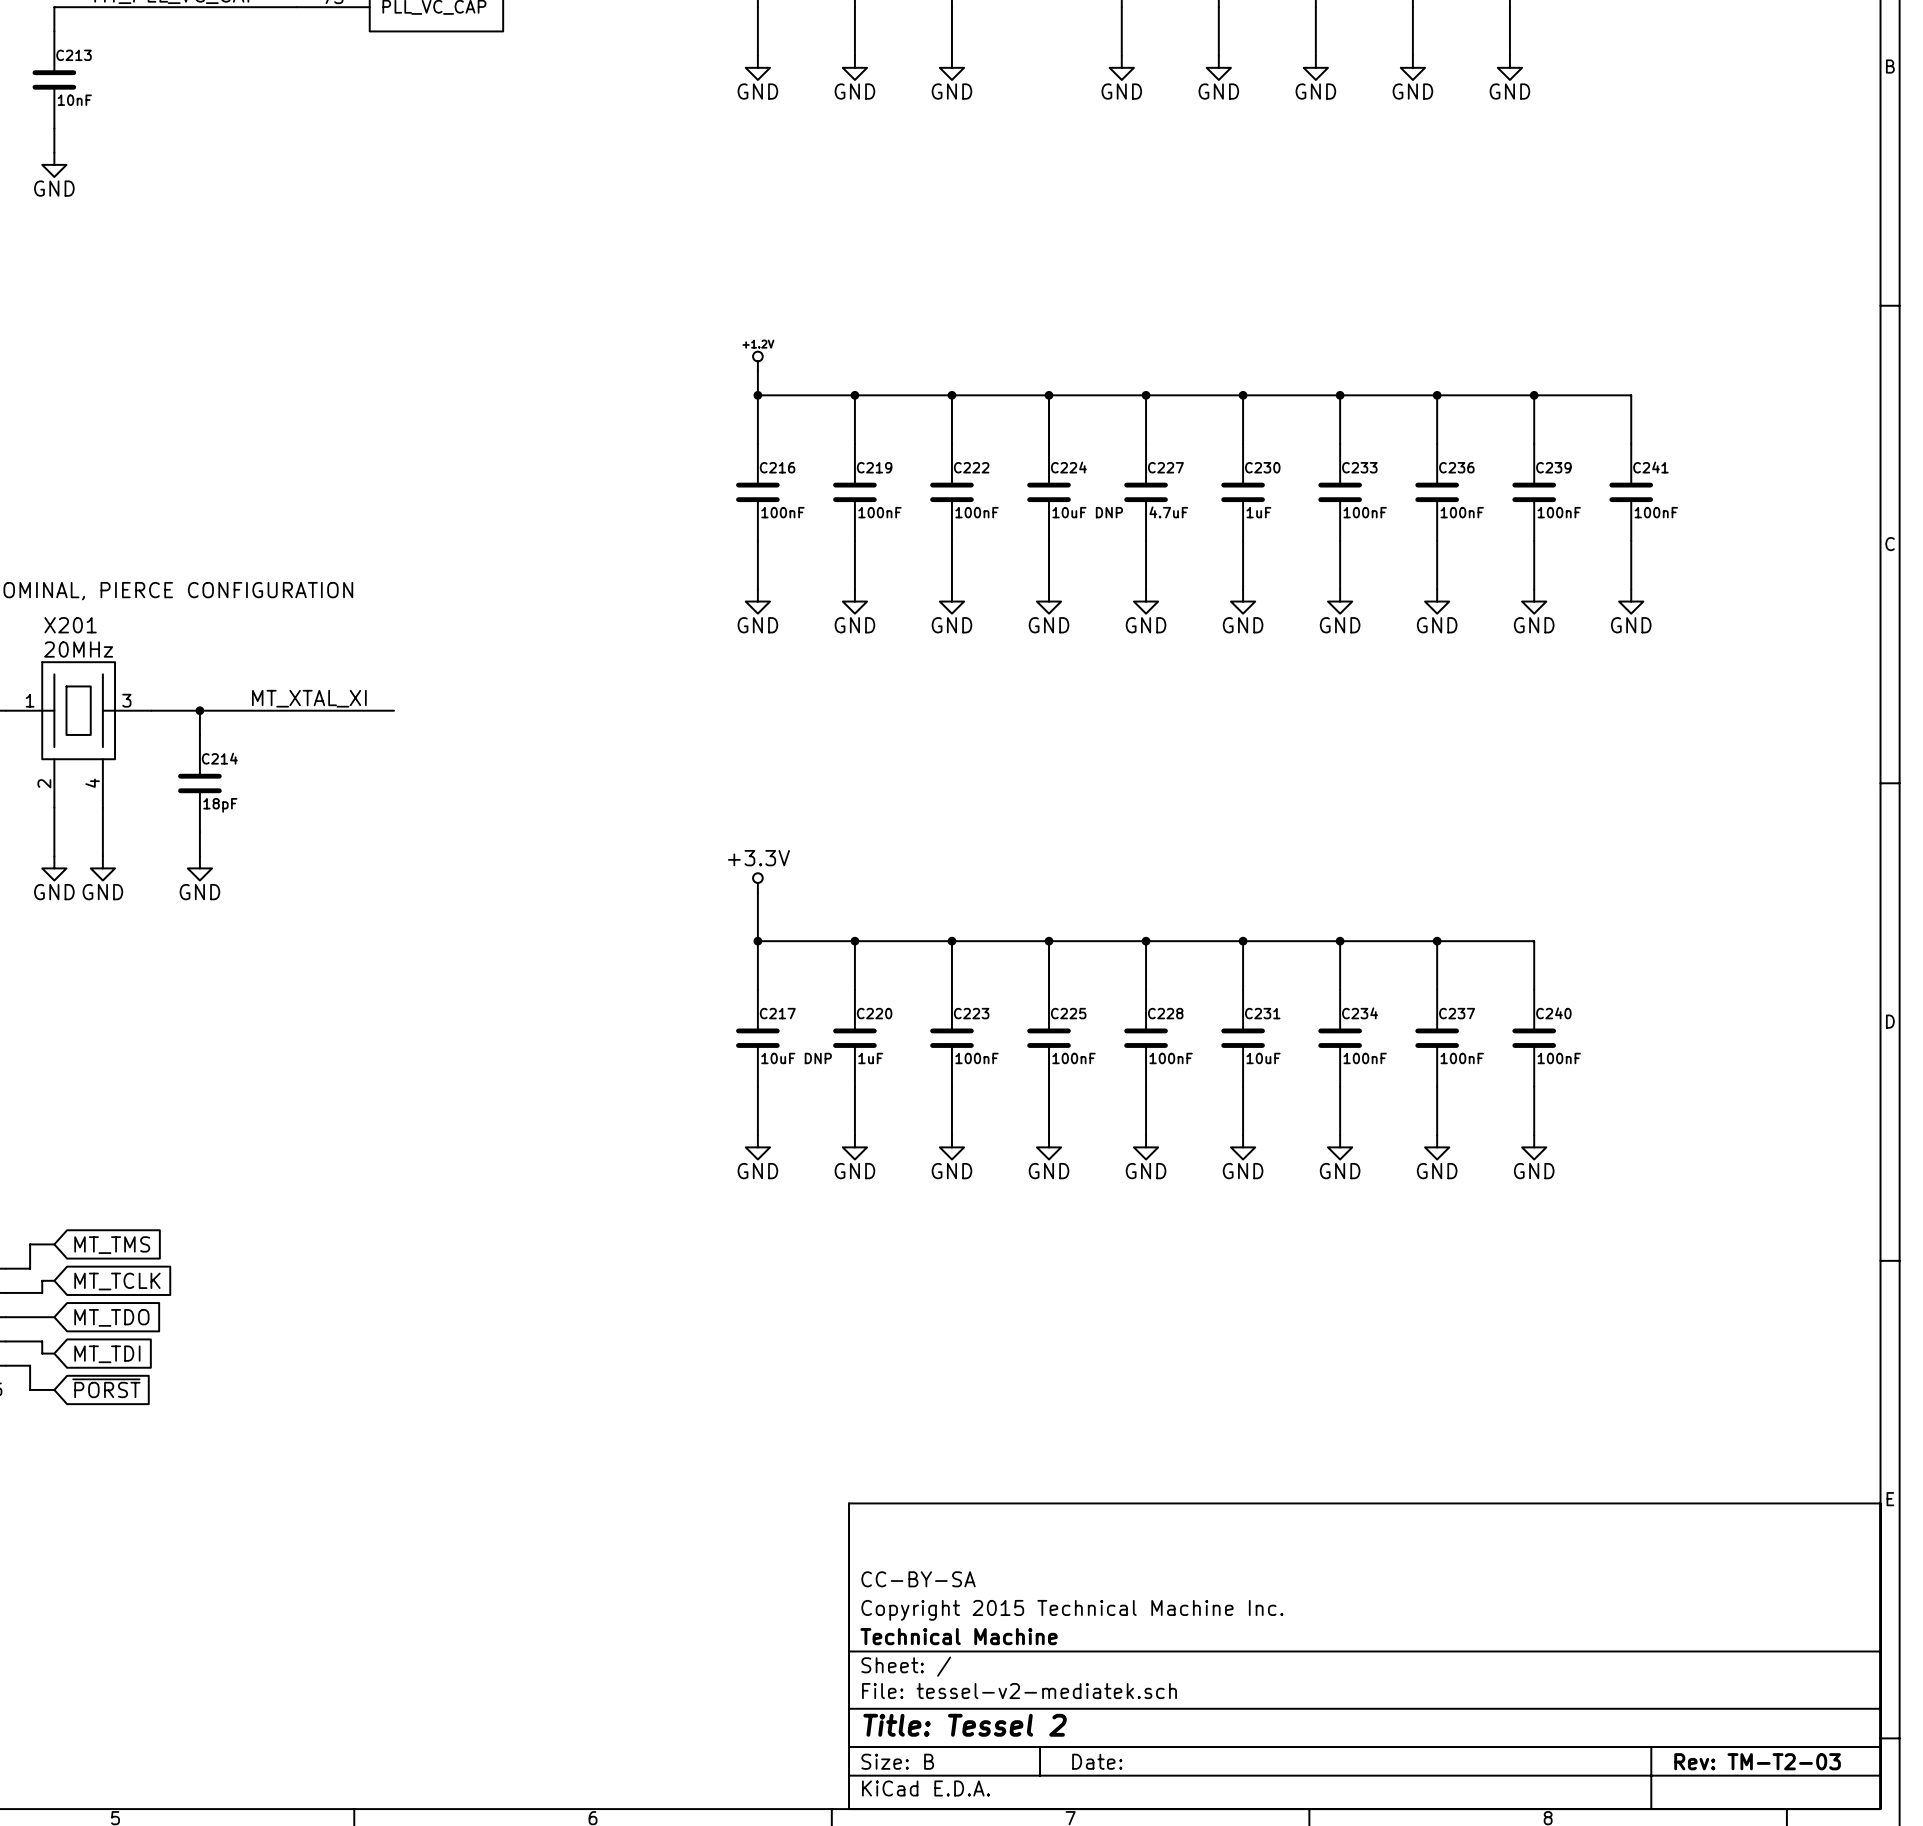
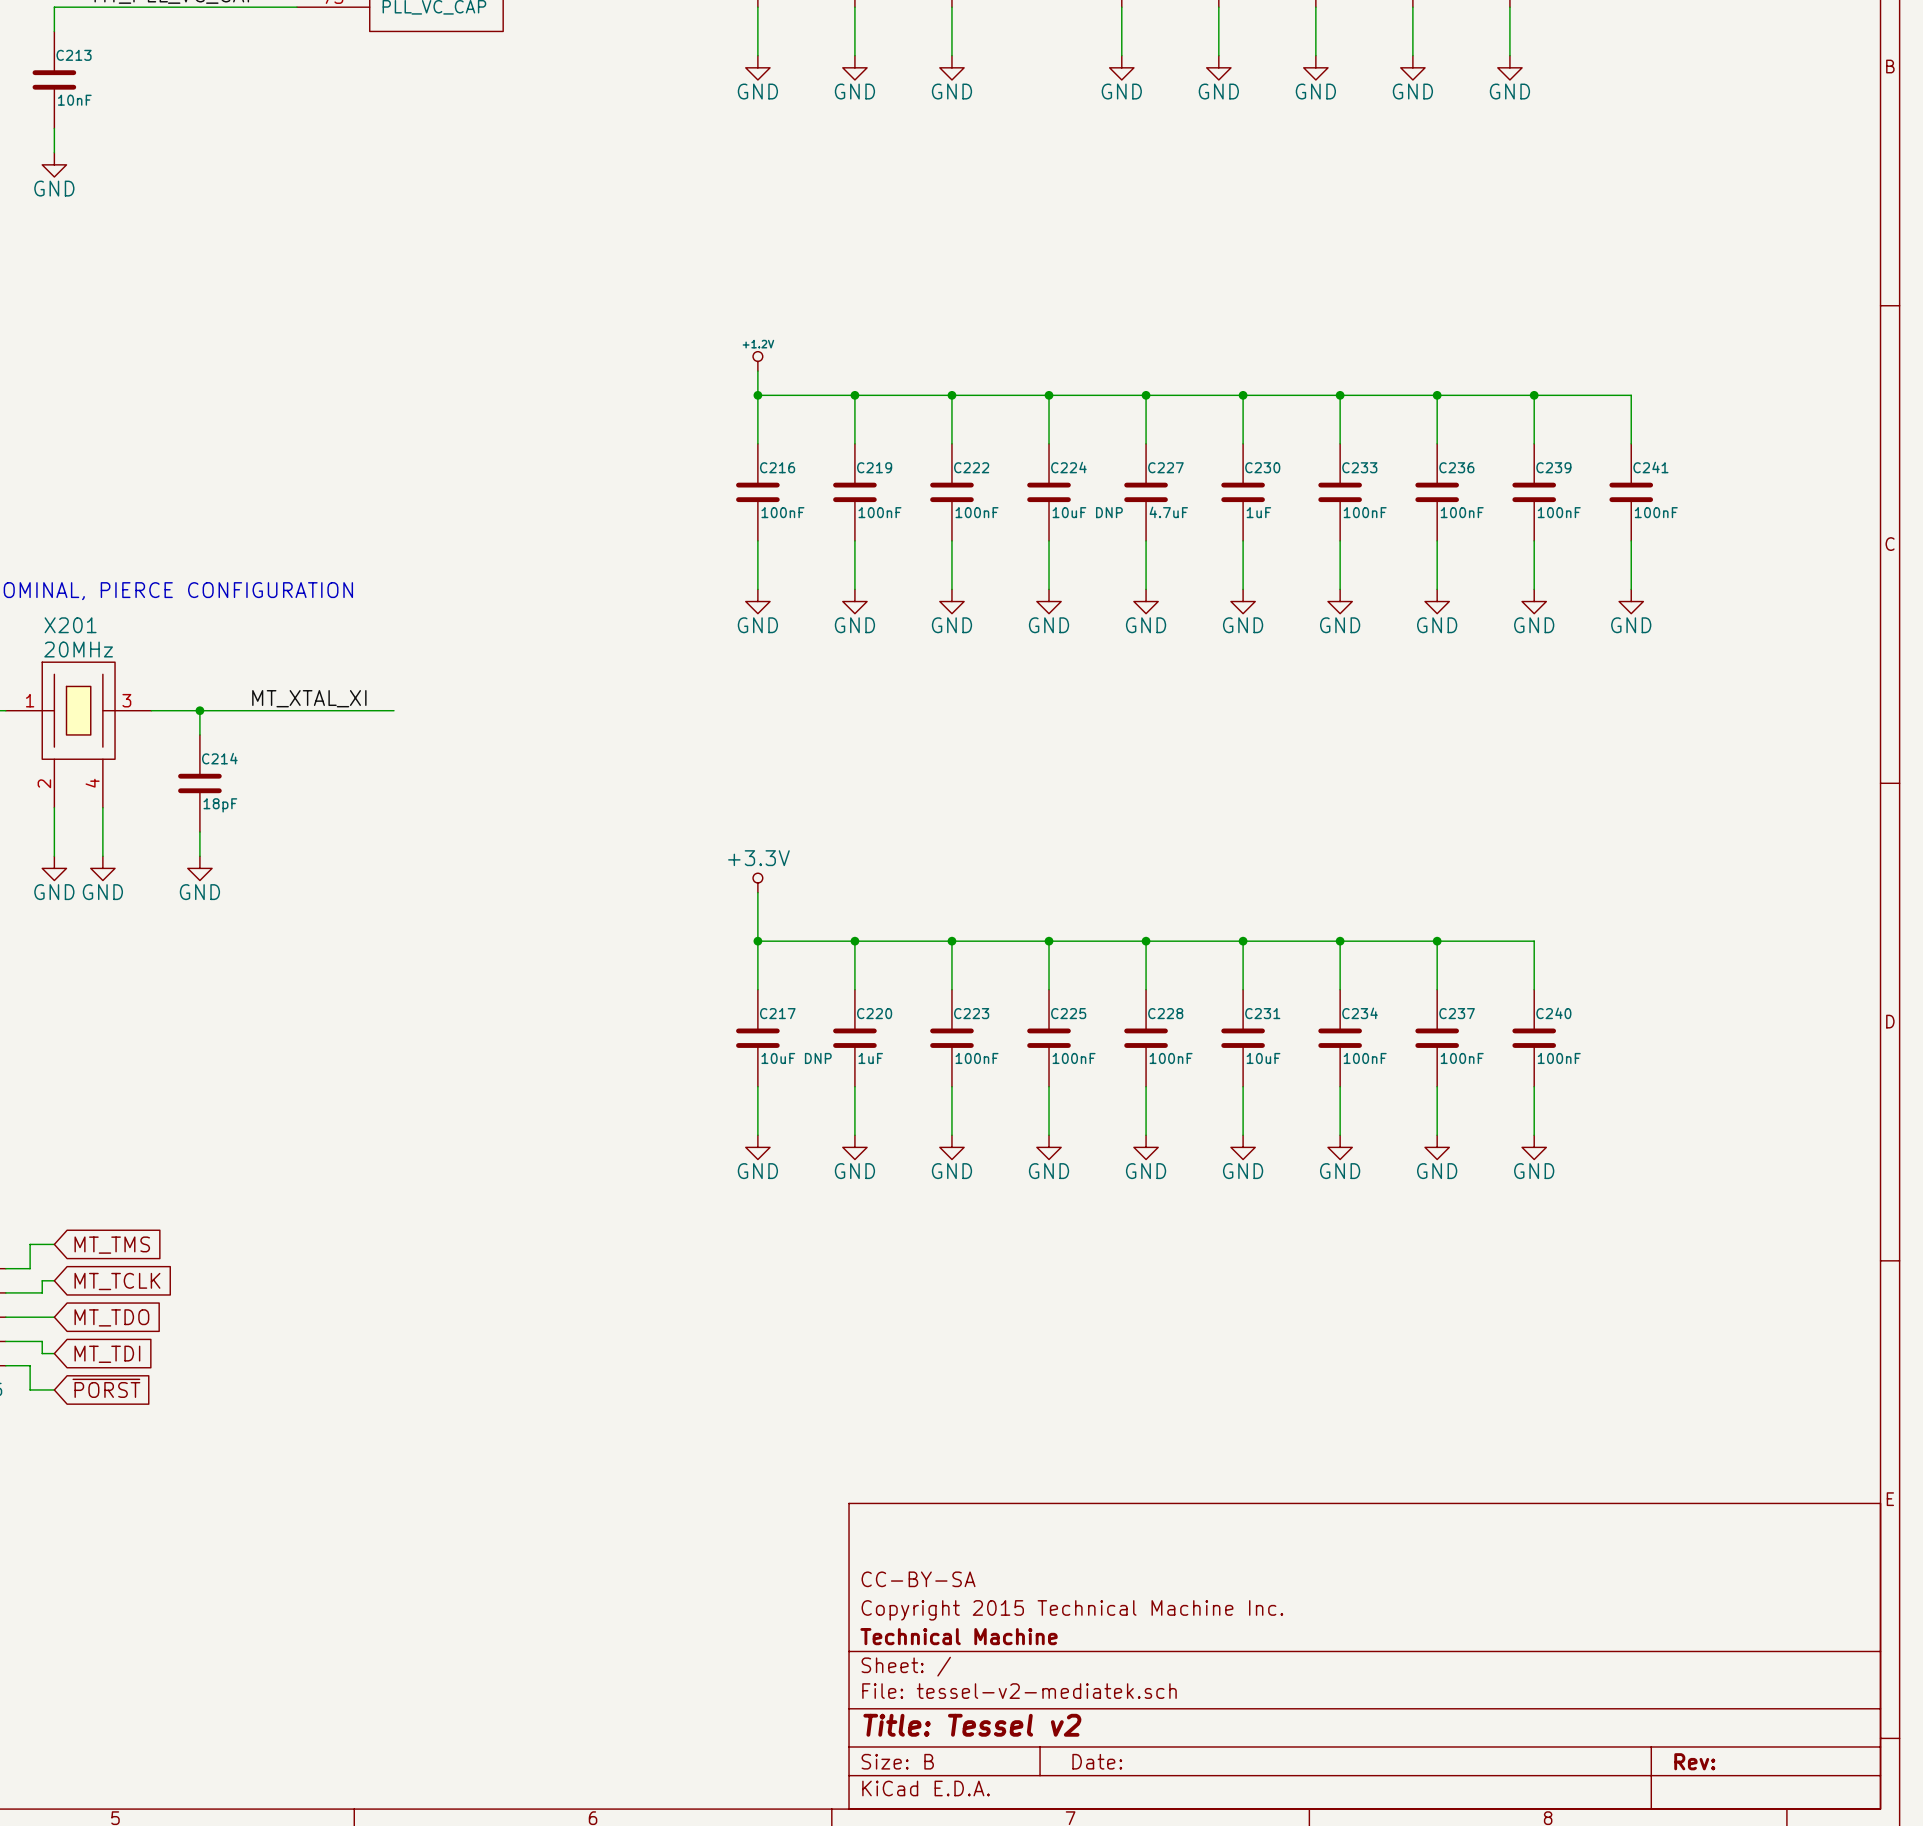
title block: Title: Tessel 2 (965, 1725) -> Title: Tessel v2 (972, 1725)
title block: Rev: TM-T2-03 (1757, 1761) -> Rev: (1694, 1761)

